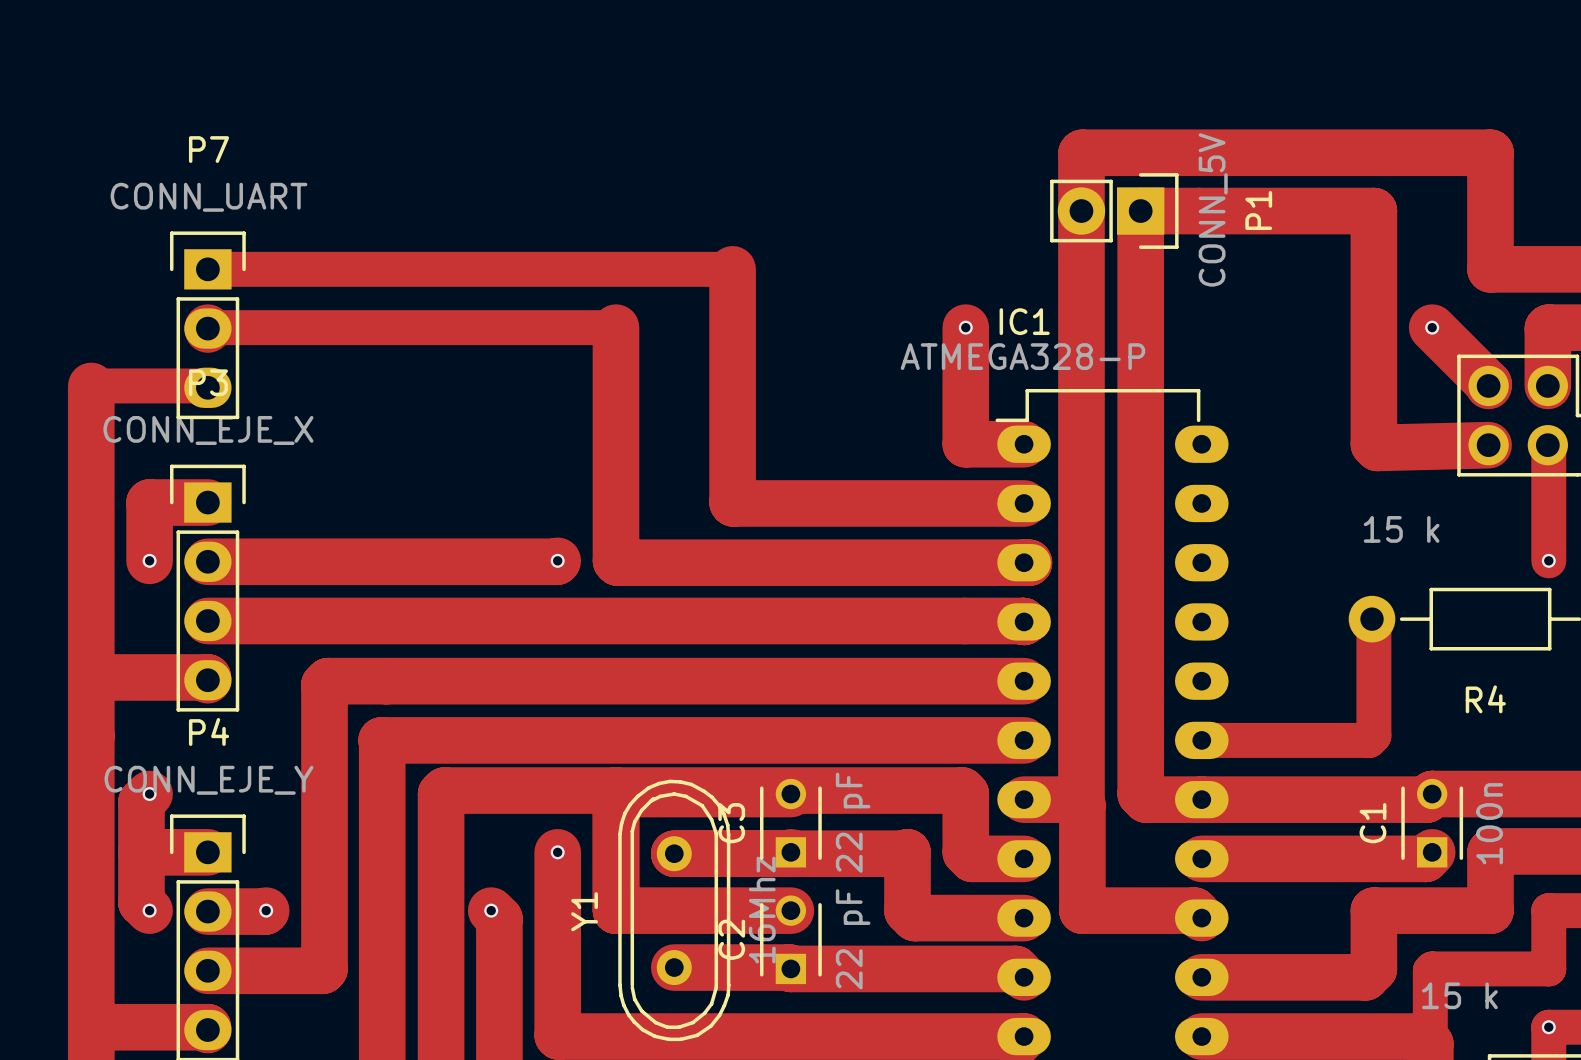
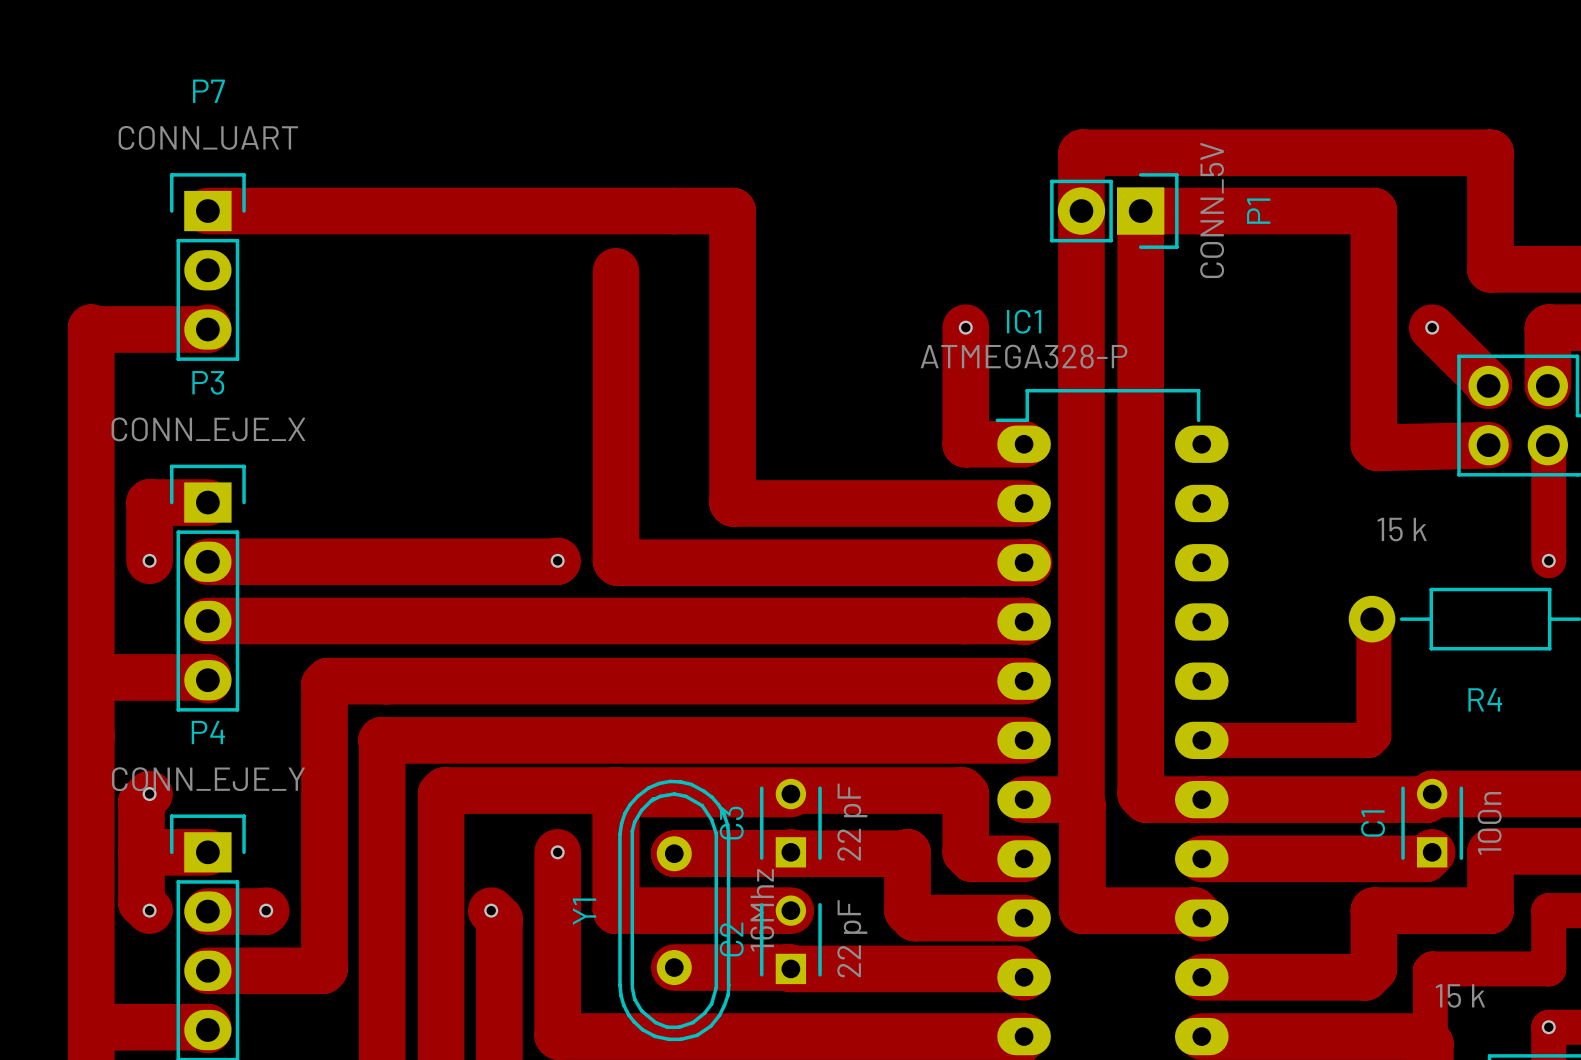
track: (207, 269) (732, 269) -> (207, 211) (732, 211) (732, 269)
P7 position: (207, 325) -> (207, 267)
track: (615, 327) (207, 328) -> (615, 327) (615, 271)
track: (91, 385) (206, 385) (207, 387) -> (91, 385) (91, 327) (93, 329) (207, 329)

